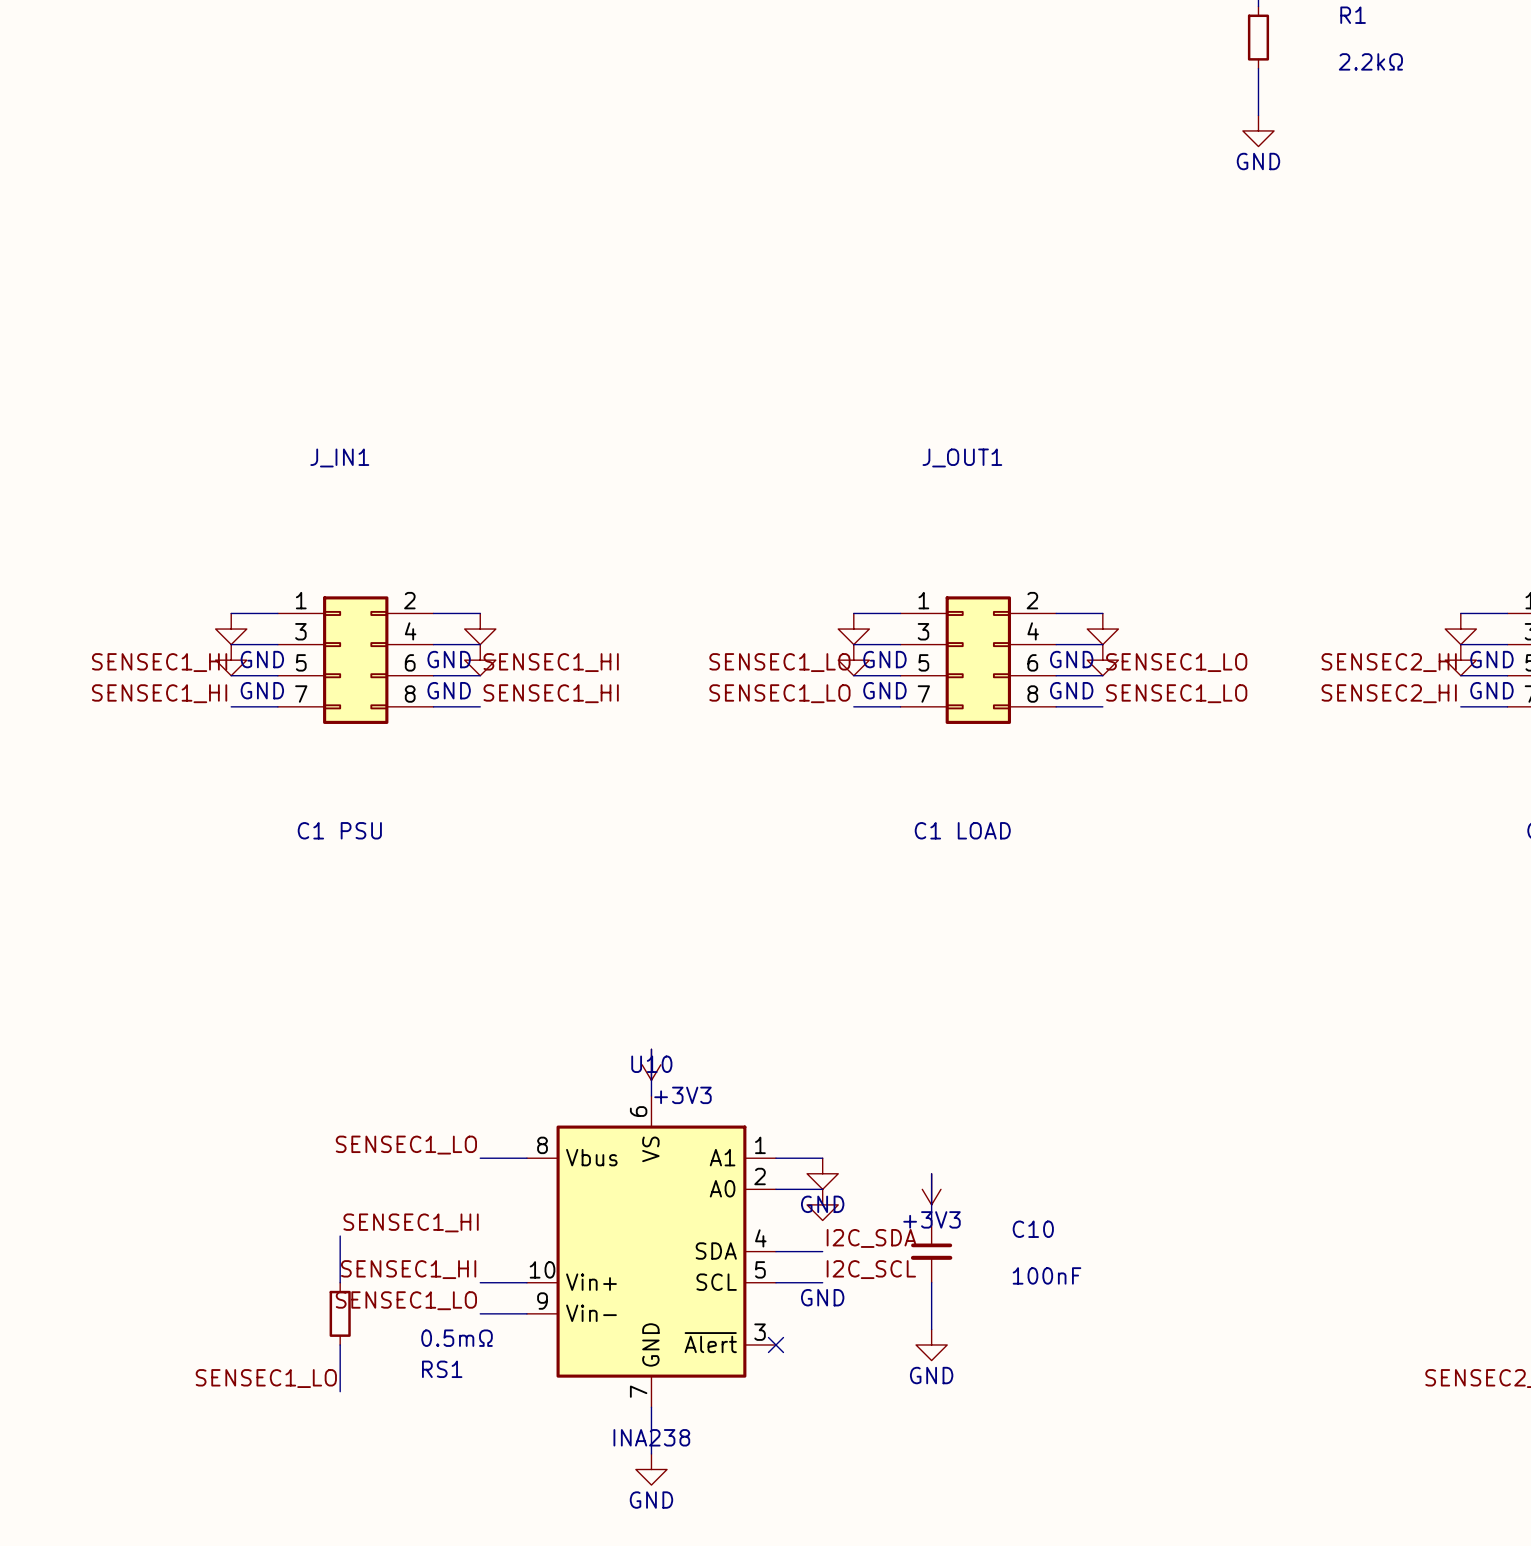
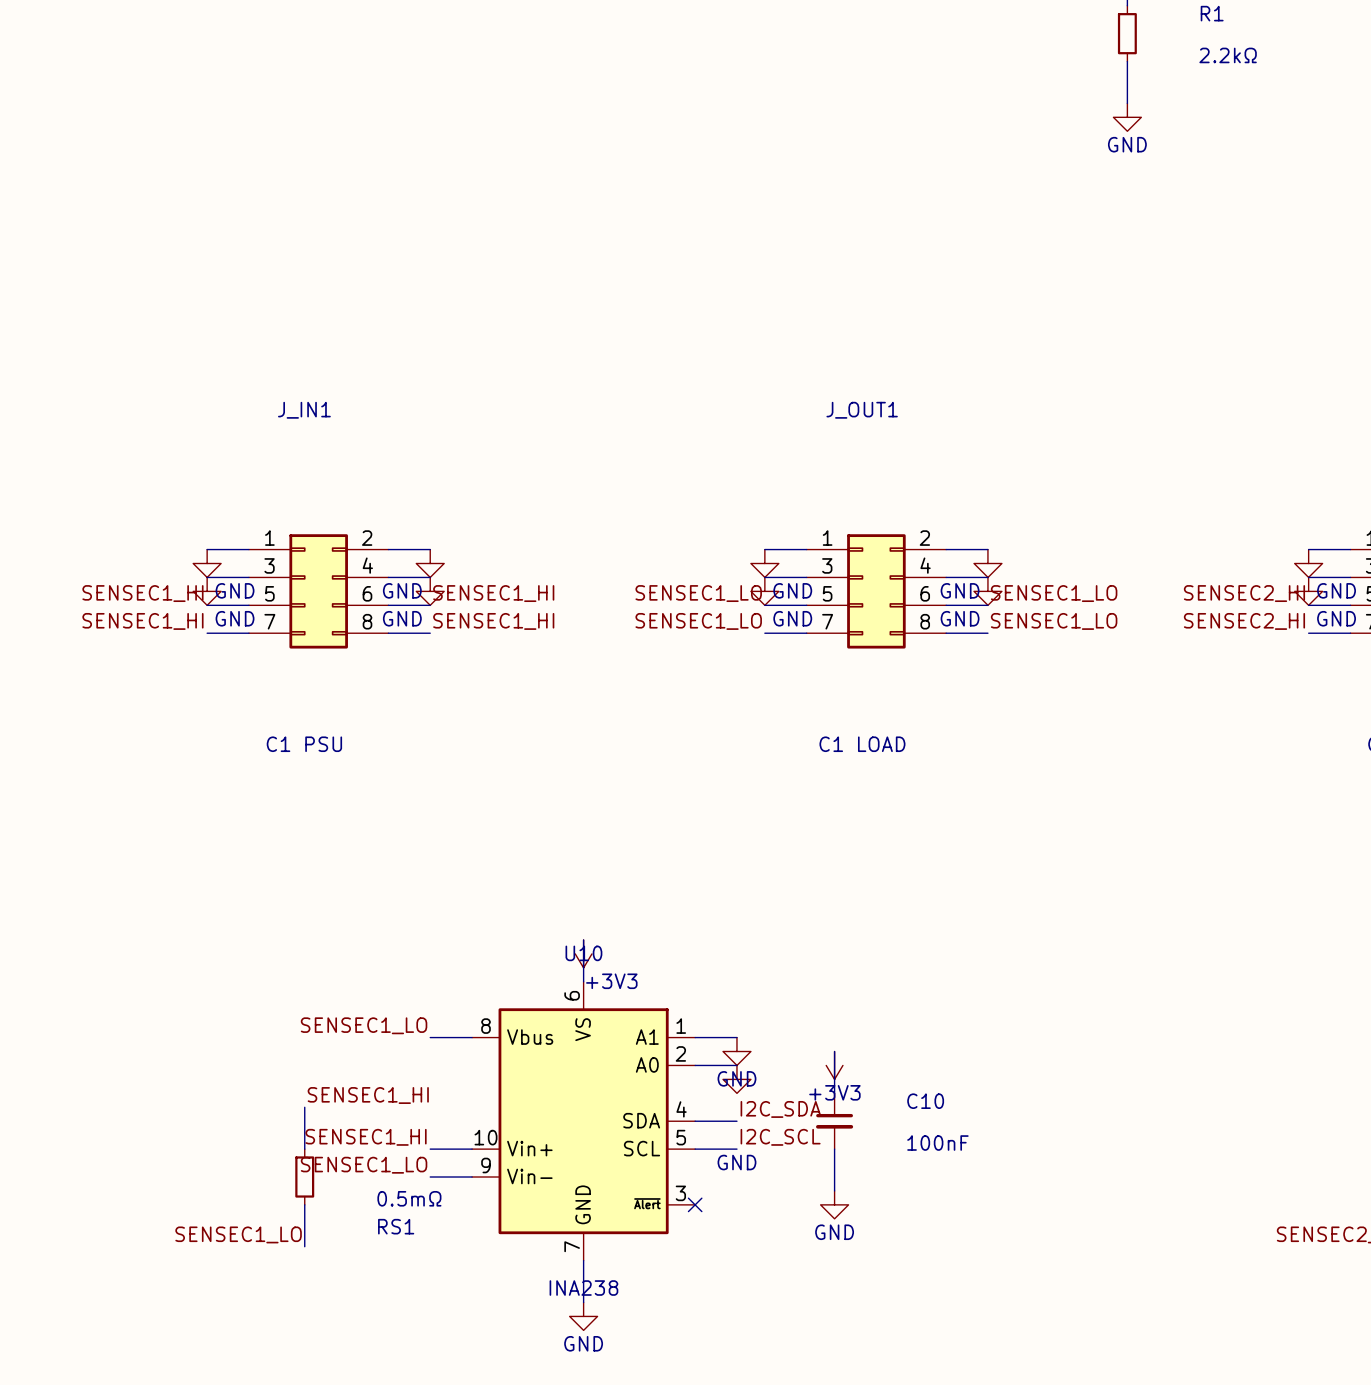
U10 symbol: [526, 1095, 776, 1408] -> [472, 981, 696, 1261]

